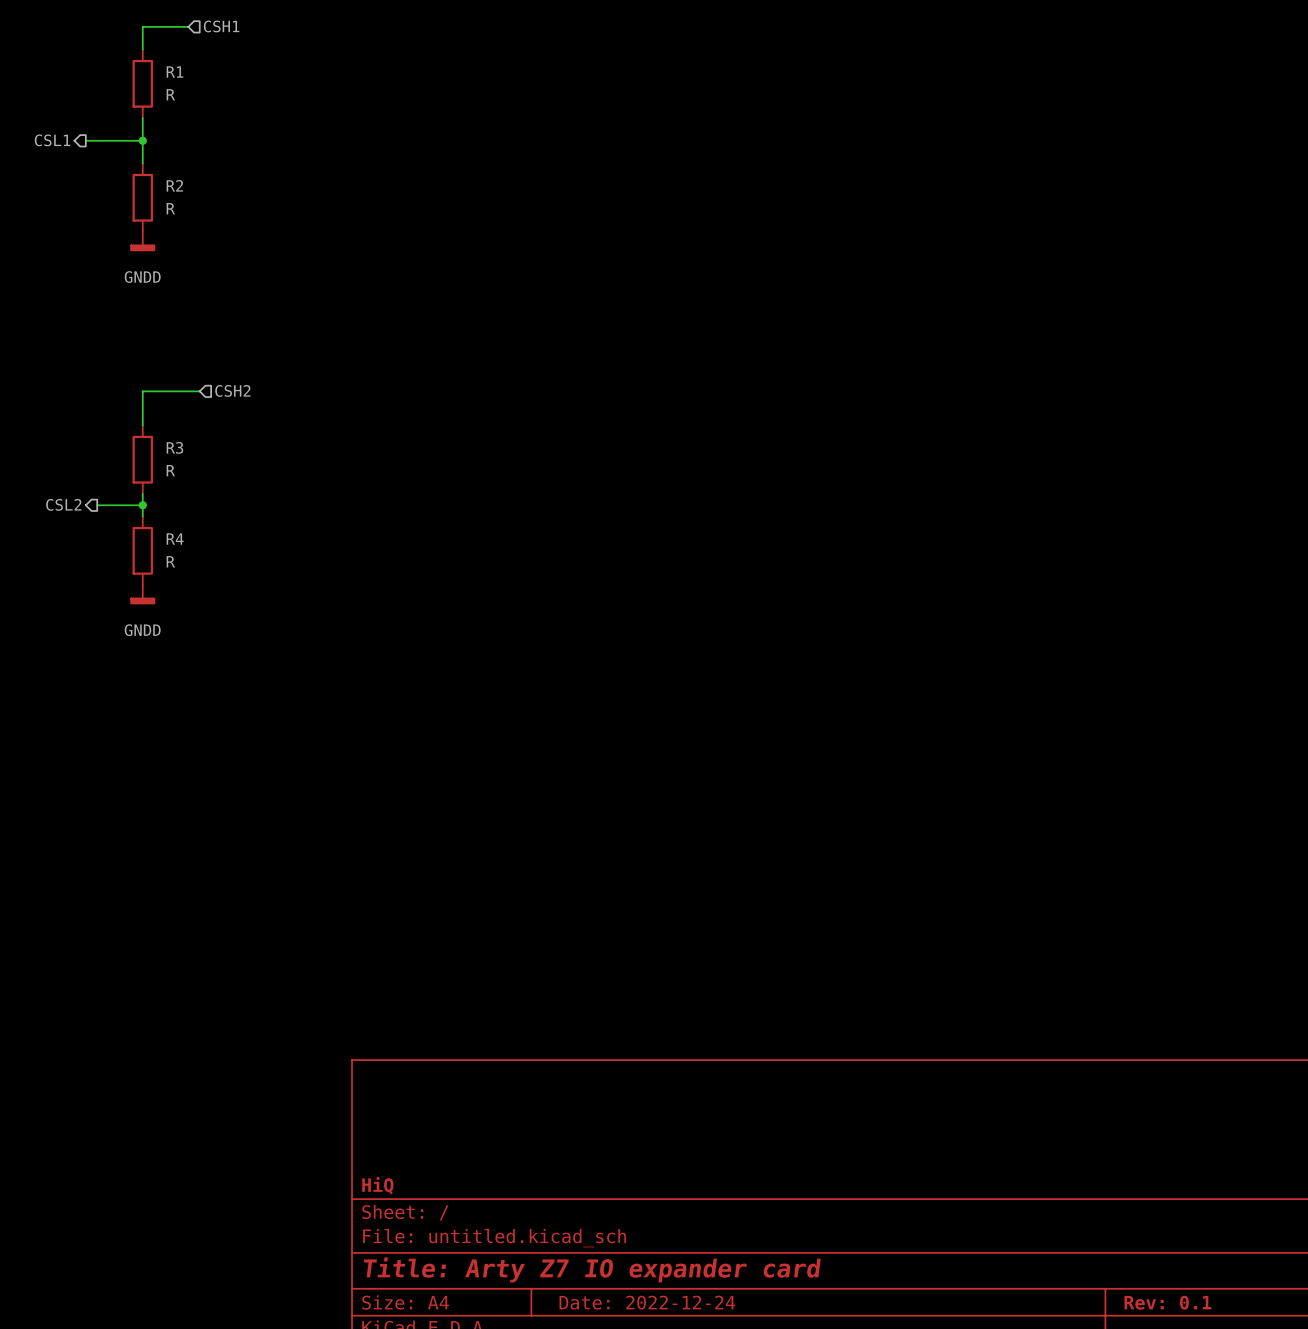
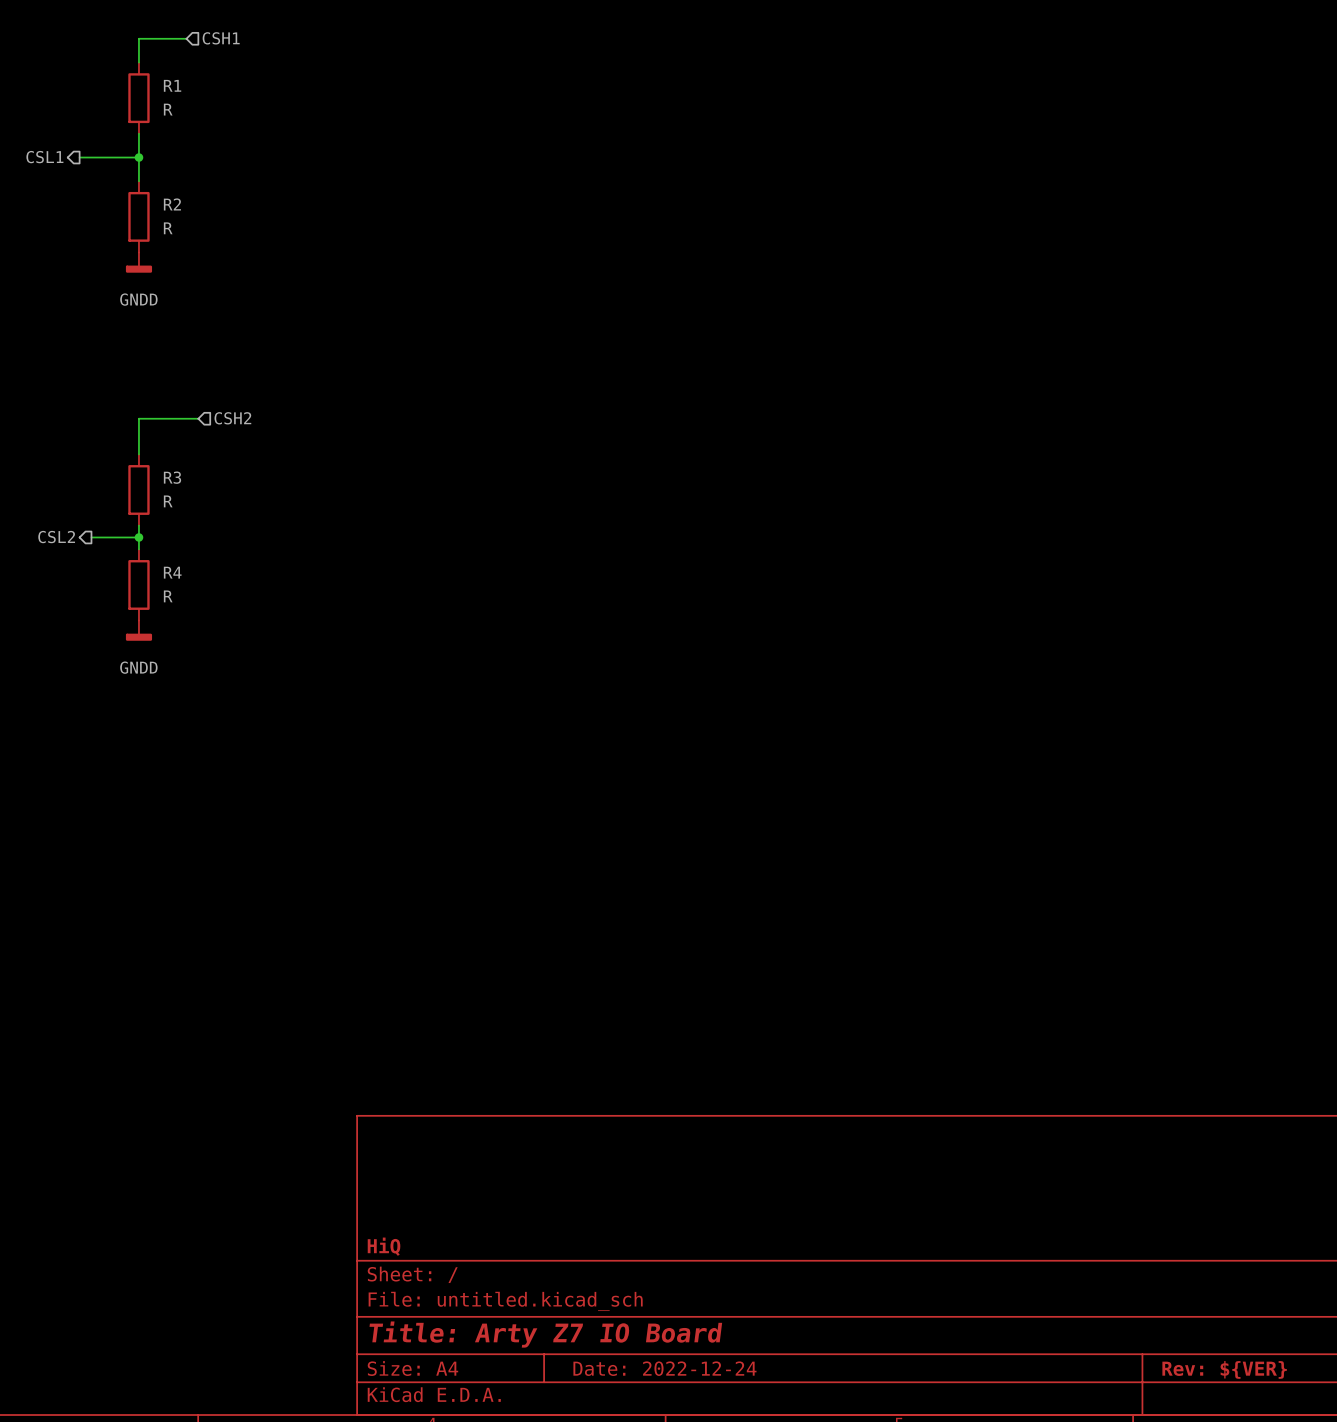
title block: Title: Arty Z7 IO expander card (592, 1269) -> Title: Arty Z7 IO Board (545, 1334)
title block: Rev: 0.1 (1167, 1302) -> Rev: ${VER} (1224, 1369)

